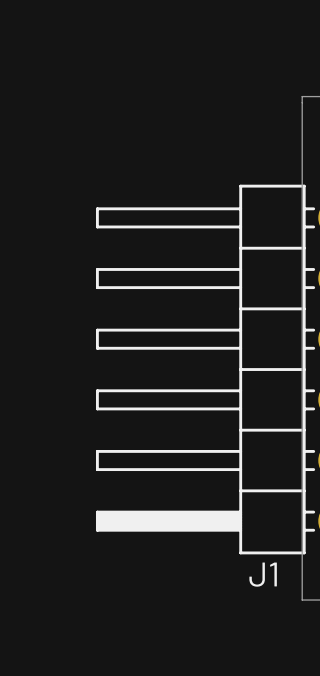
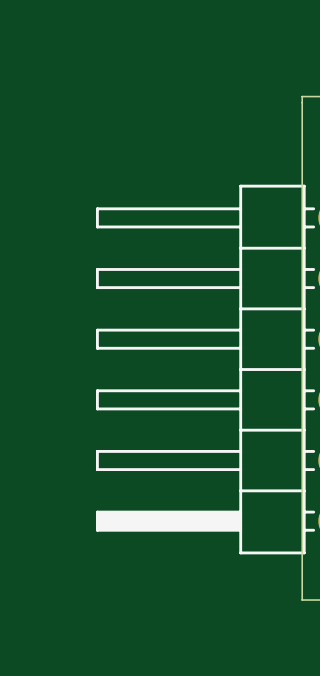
J1 name: J1 (263, 574) -> none

